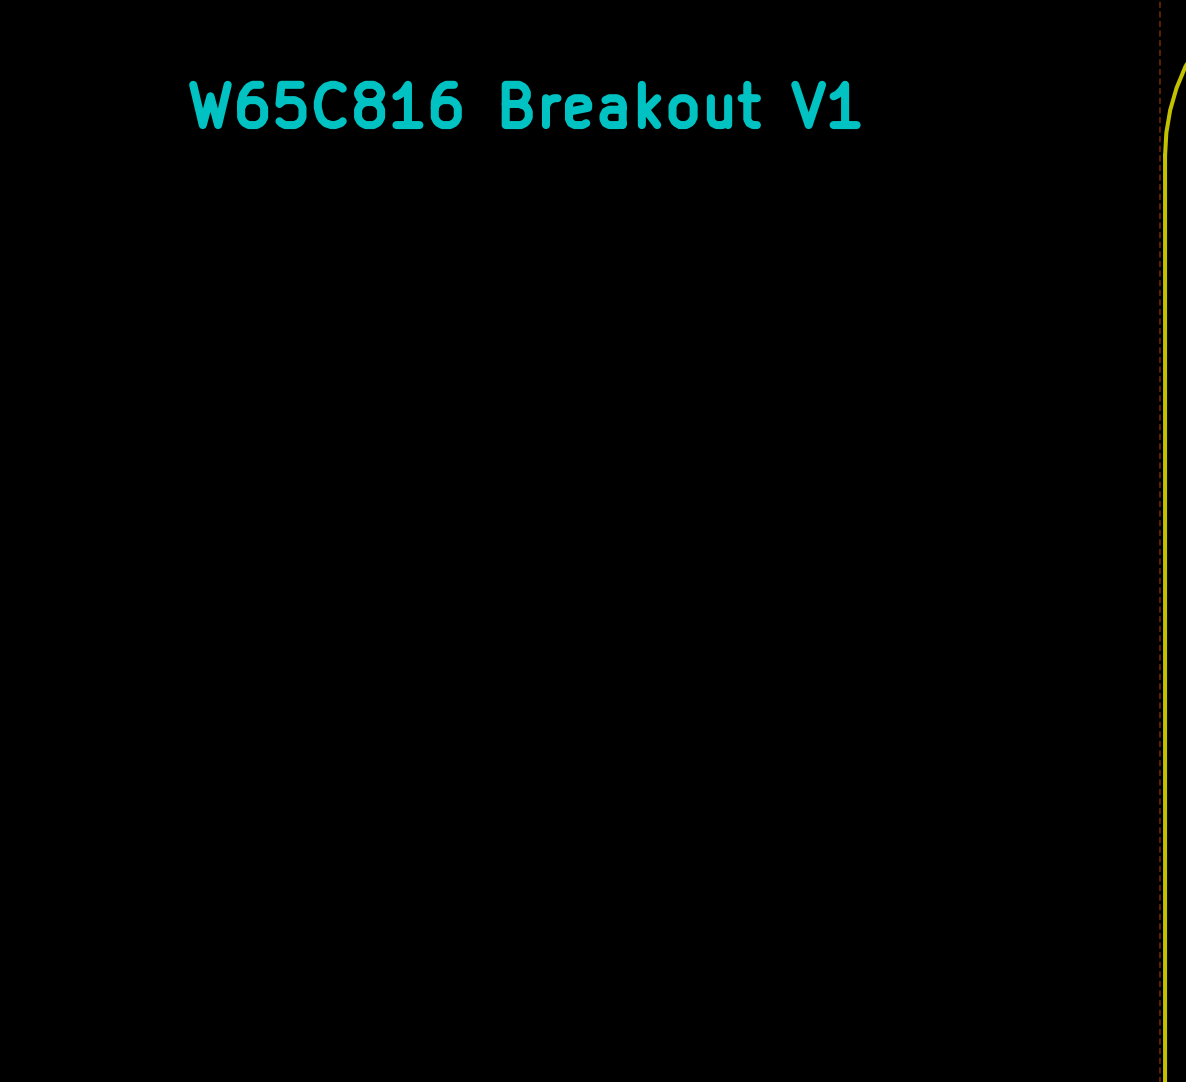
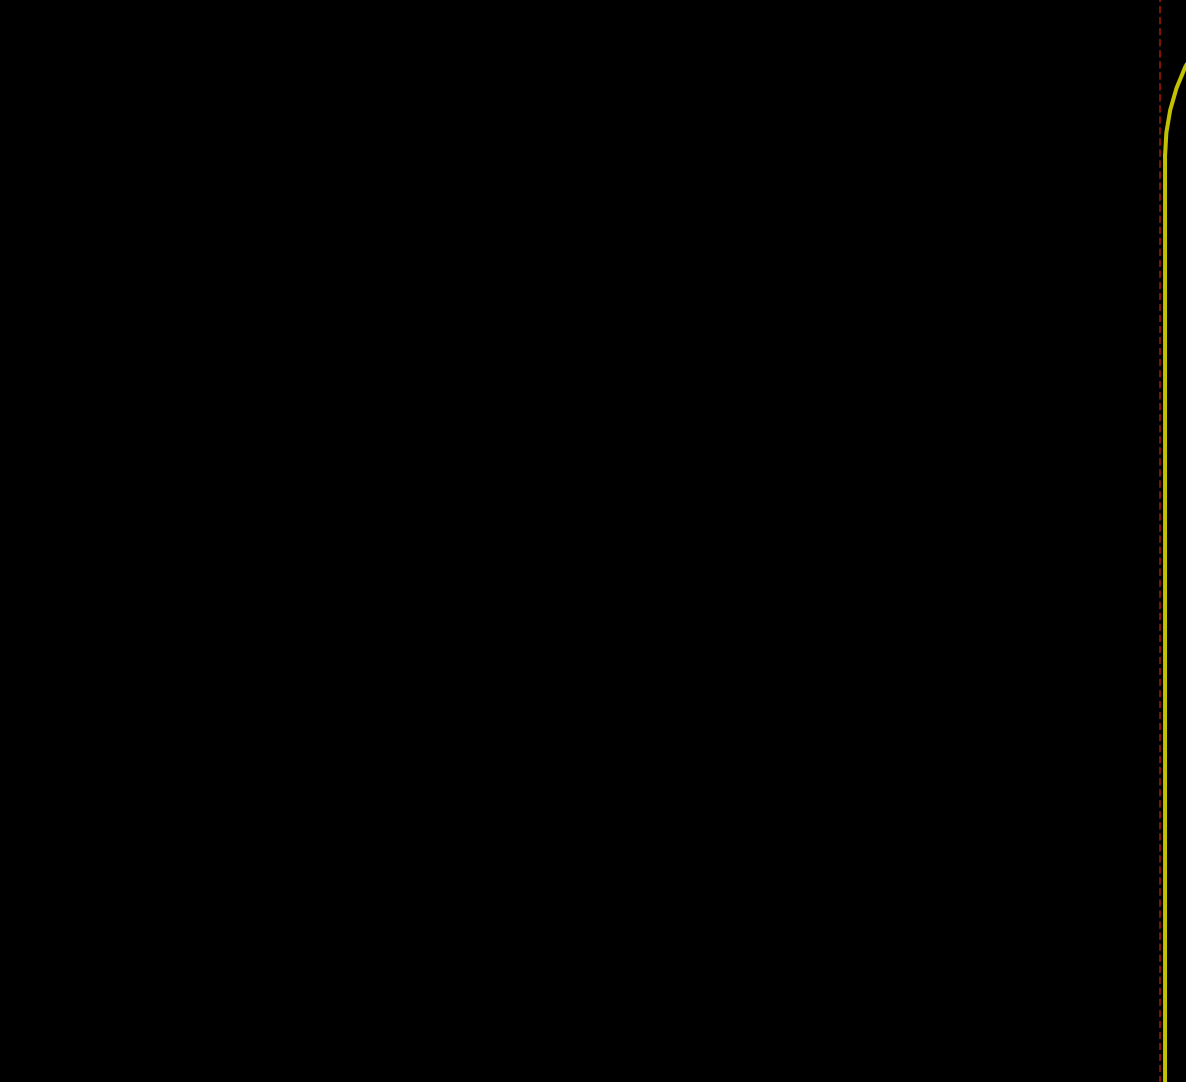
text: W65C816 Breakout V1 (524, 104) -> none

